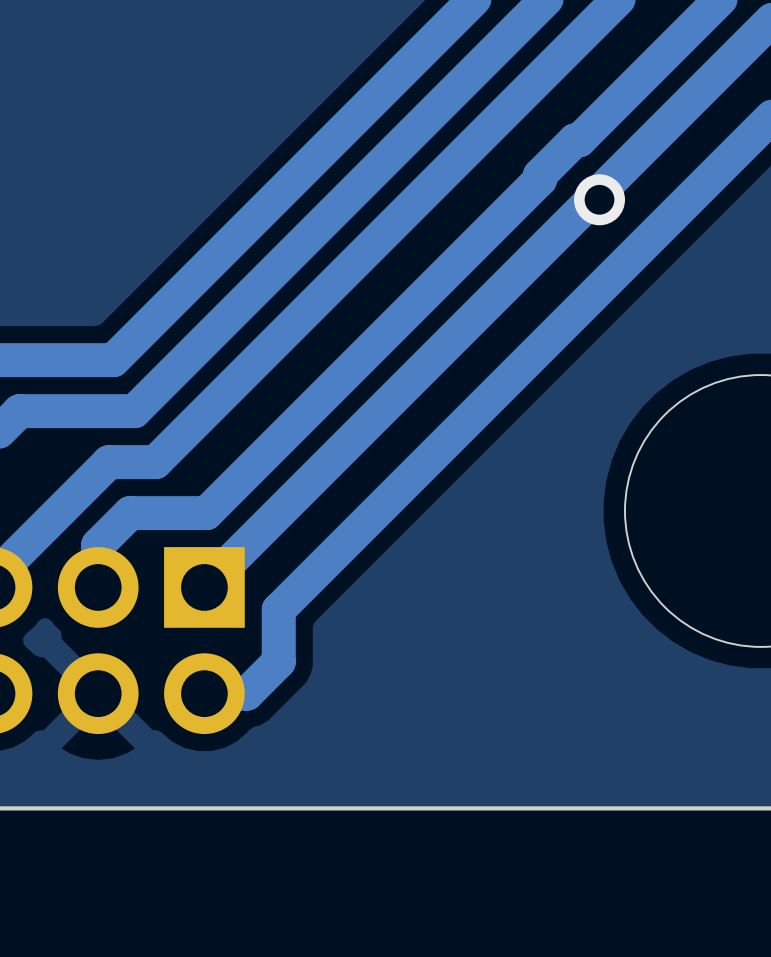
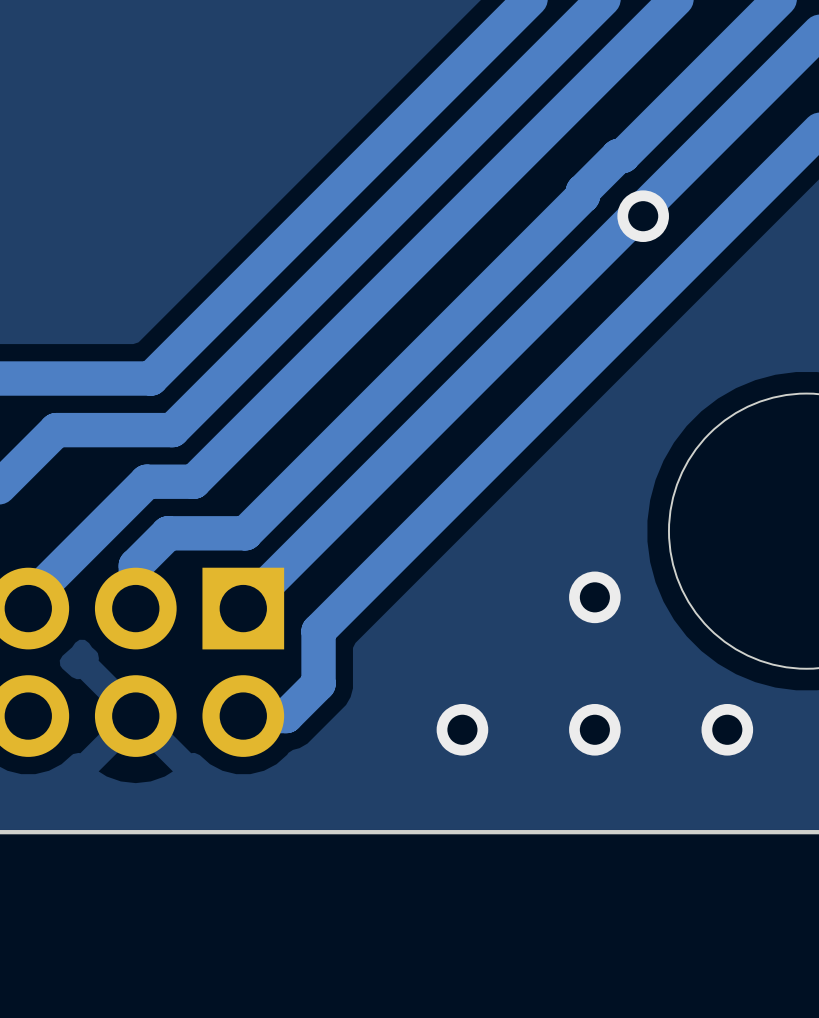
via: none -> (594, 597)
via: none -> (462, 729)
via: none -> (594, 729)
via: none -> (727, 729)

